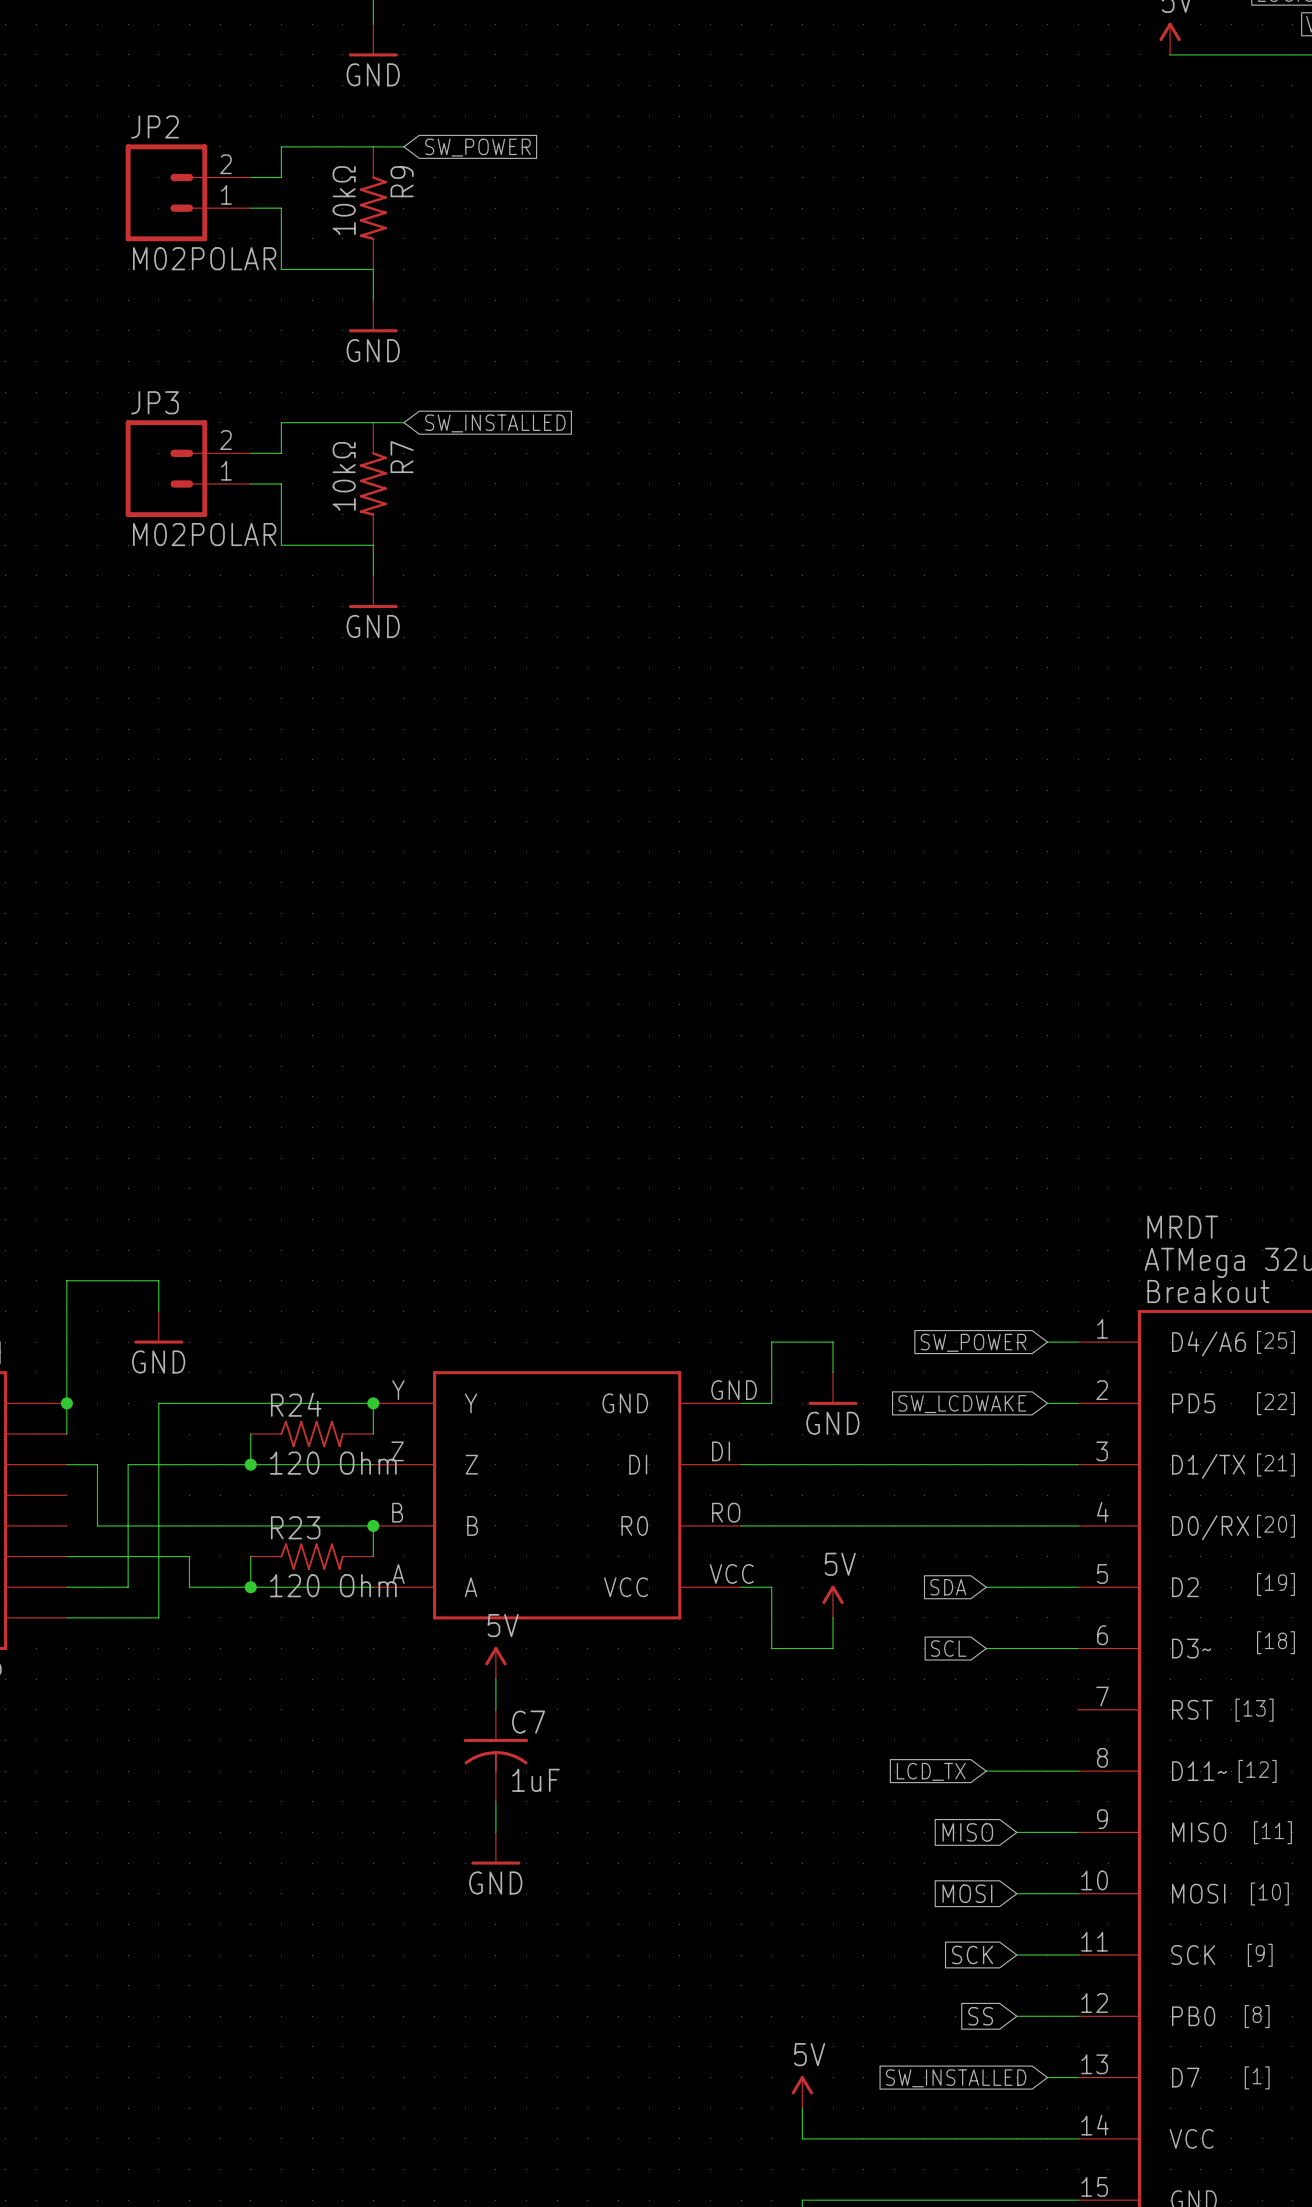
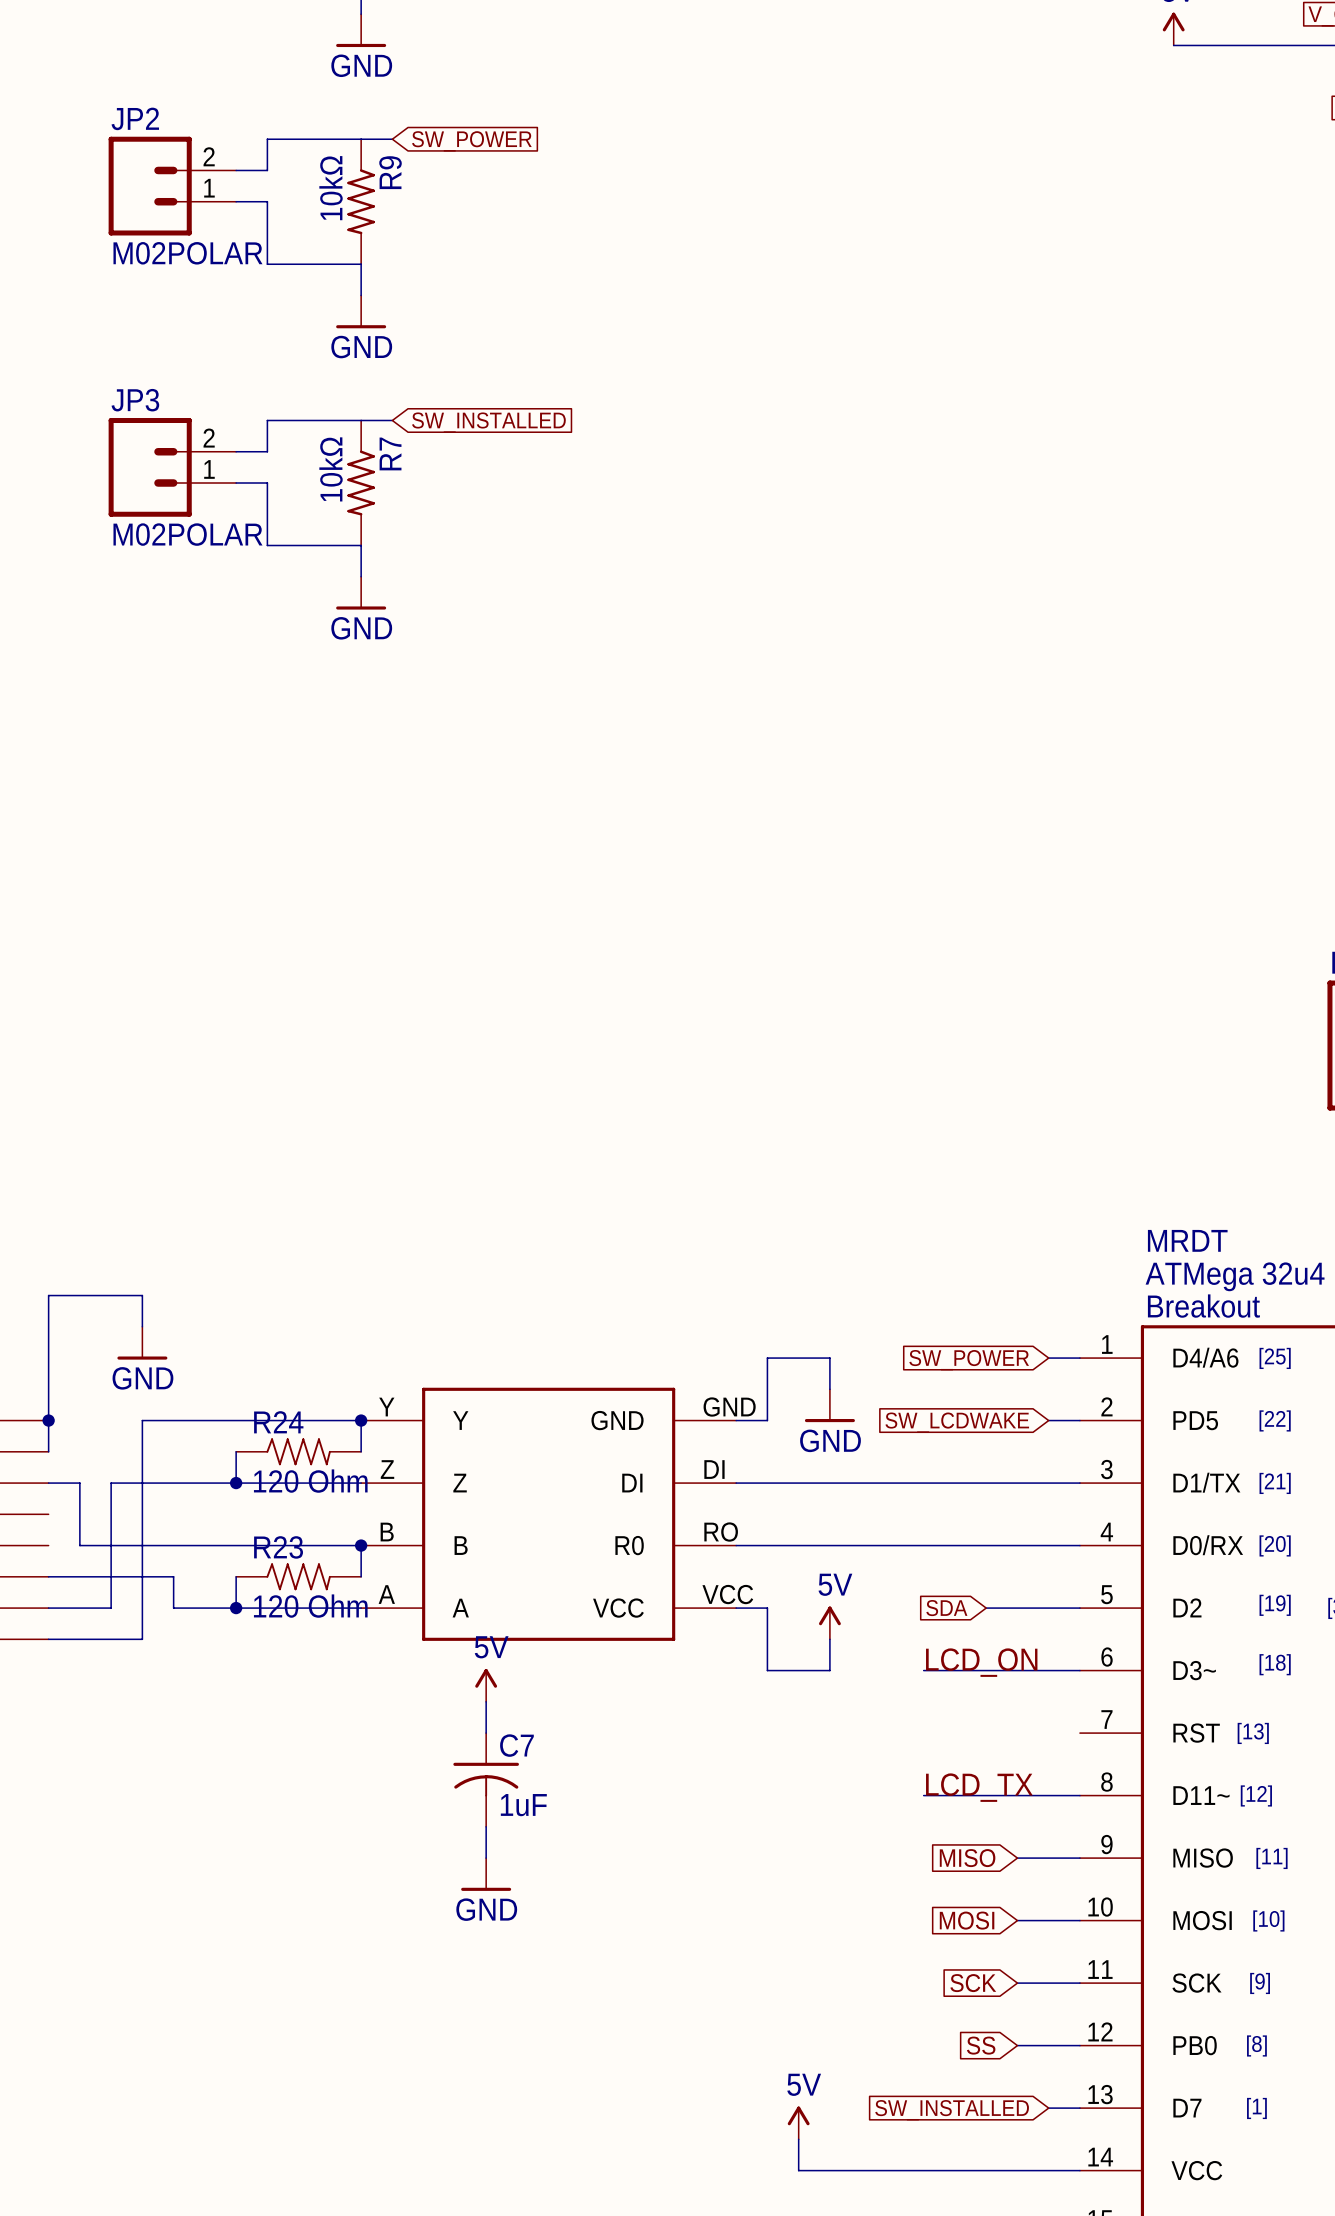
label: none -> LCD_ON (981, 1662)
wire: none -> (923, 1670) (986, 1670)
global label: SCL (948, 1648) -> none
label: none -> LCD_TX (979, 1787)
wire: none -> (923, 1795) (986, 1795)
global label: LCD_TX (931, 1771) -> none

